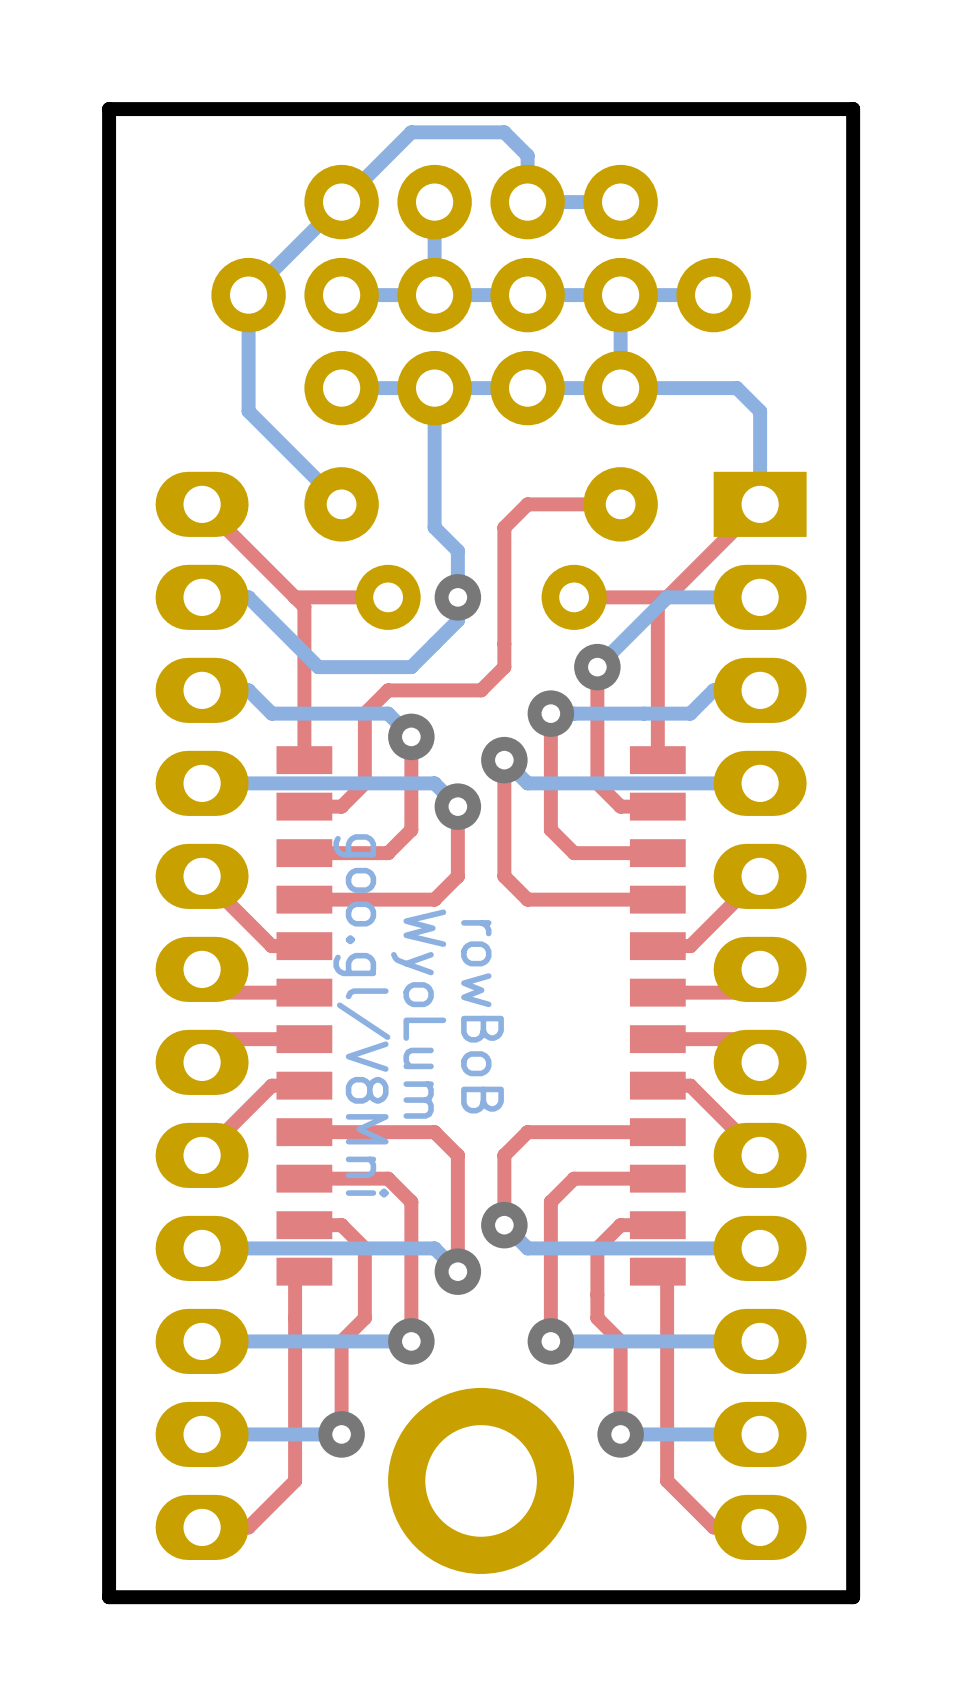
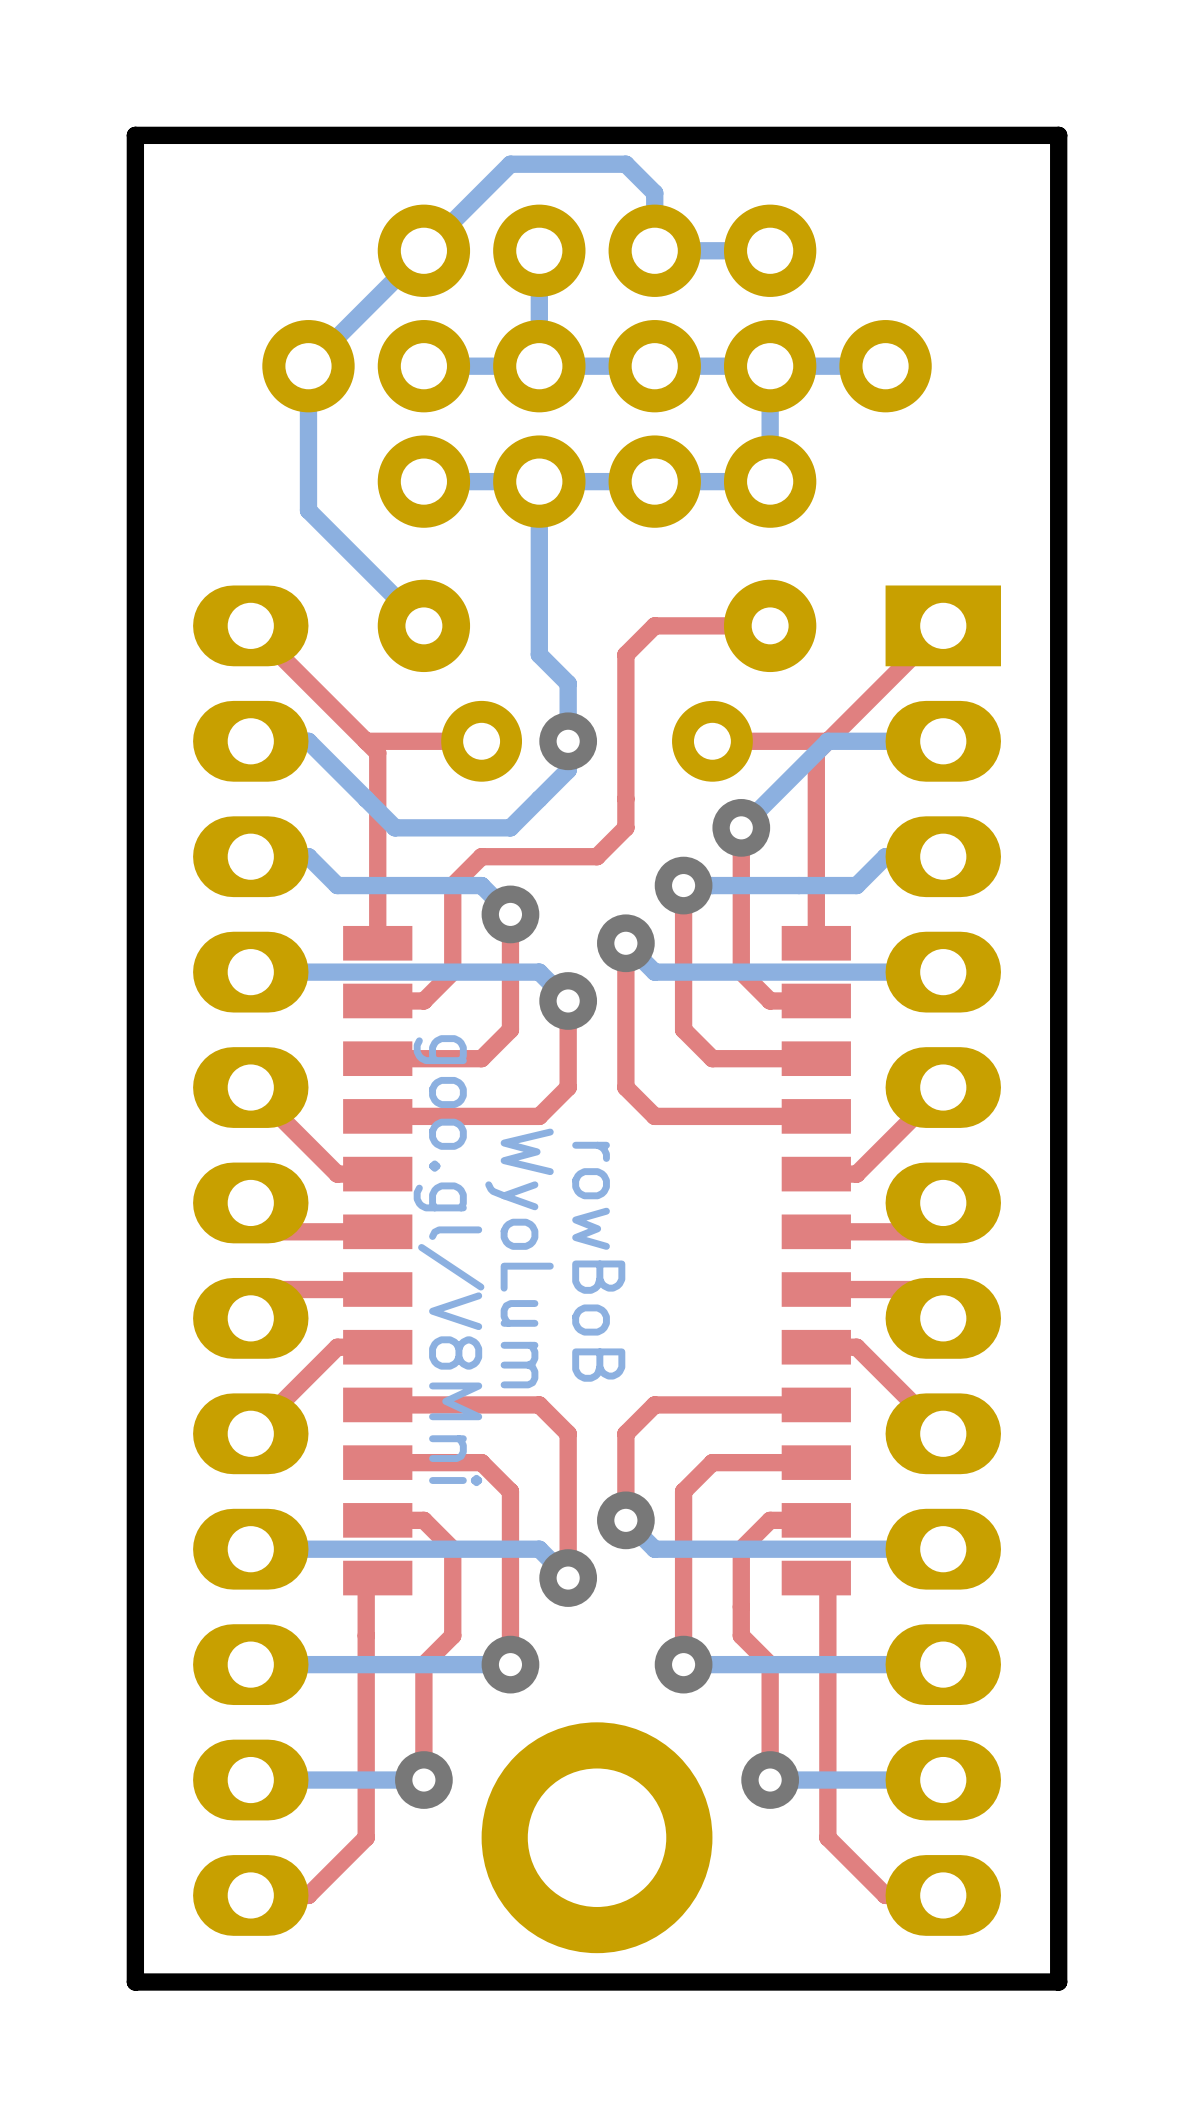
bottom track: (620, 388) (736, 388) (760, 411) (760, 504) -> none

